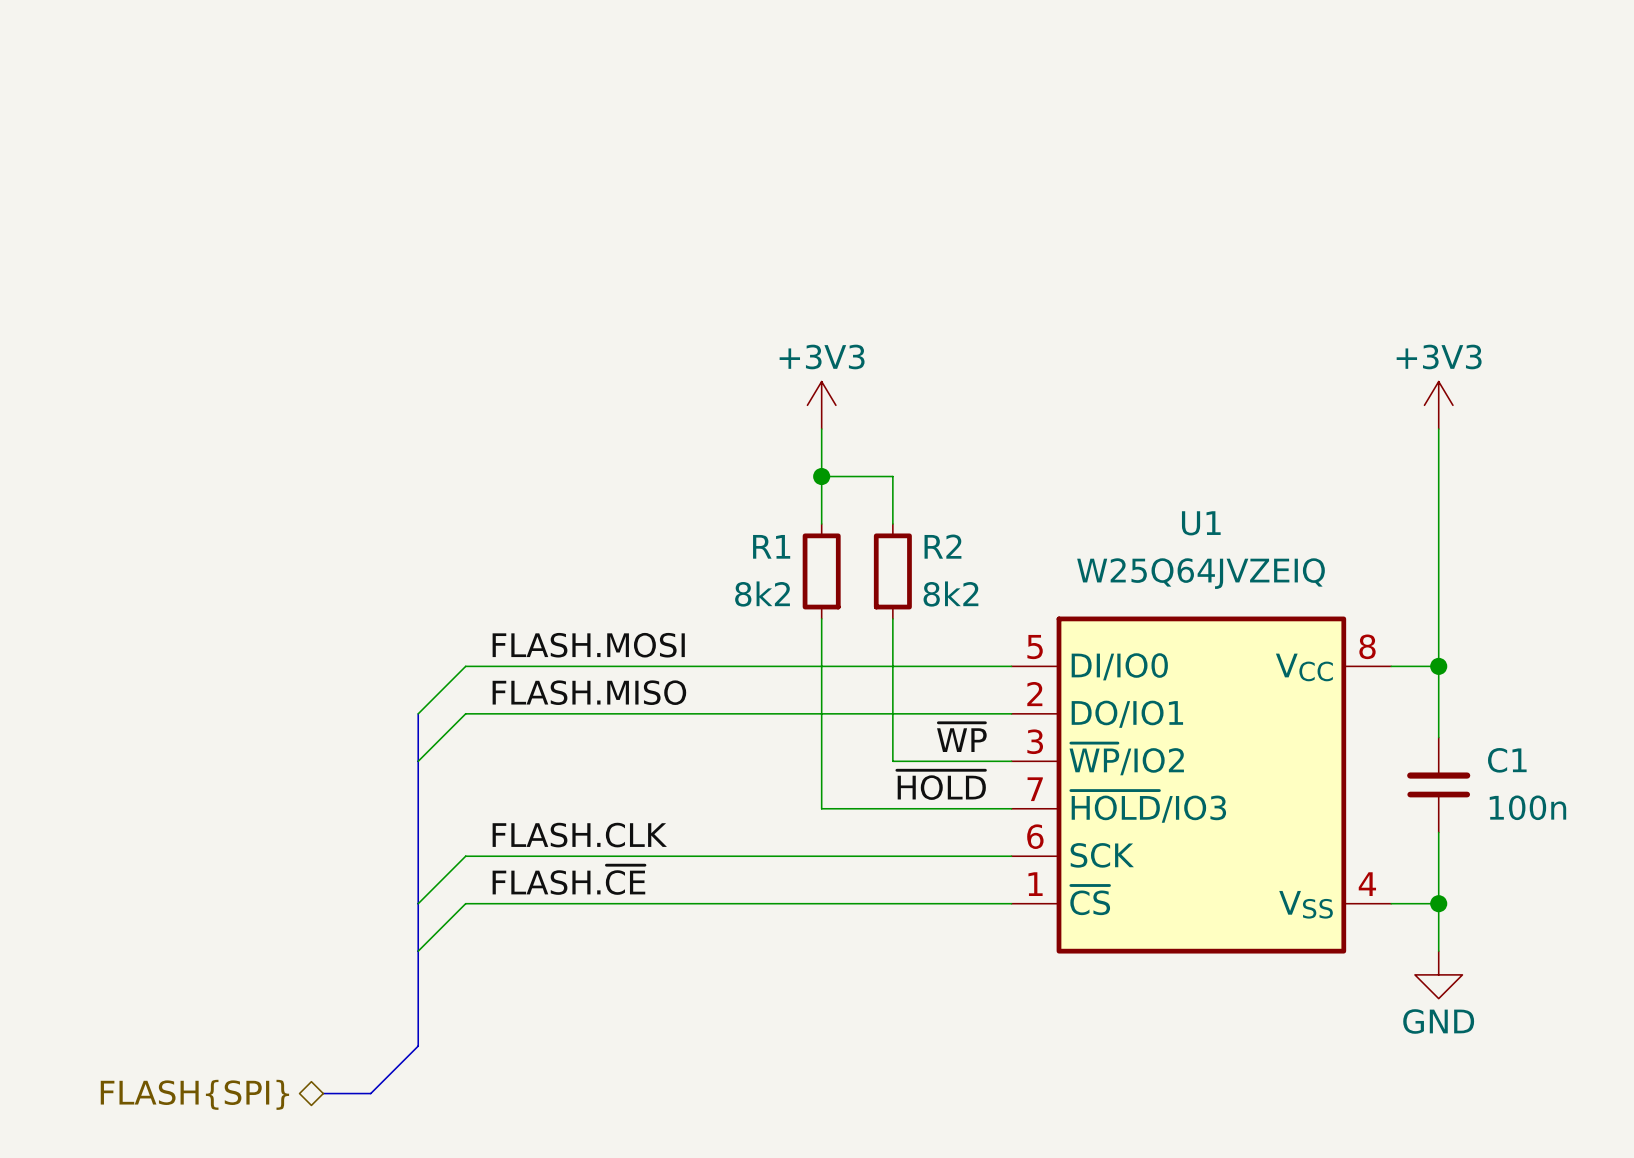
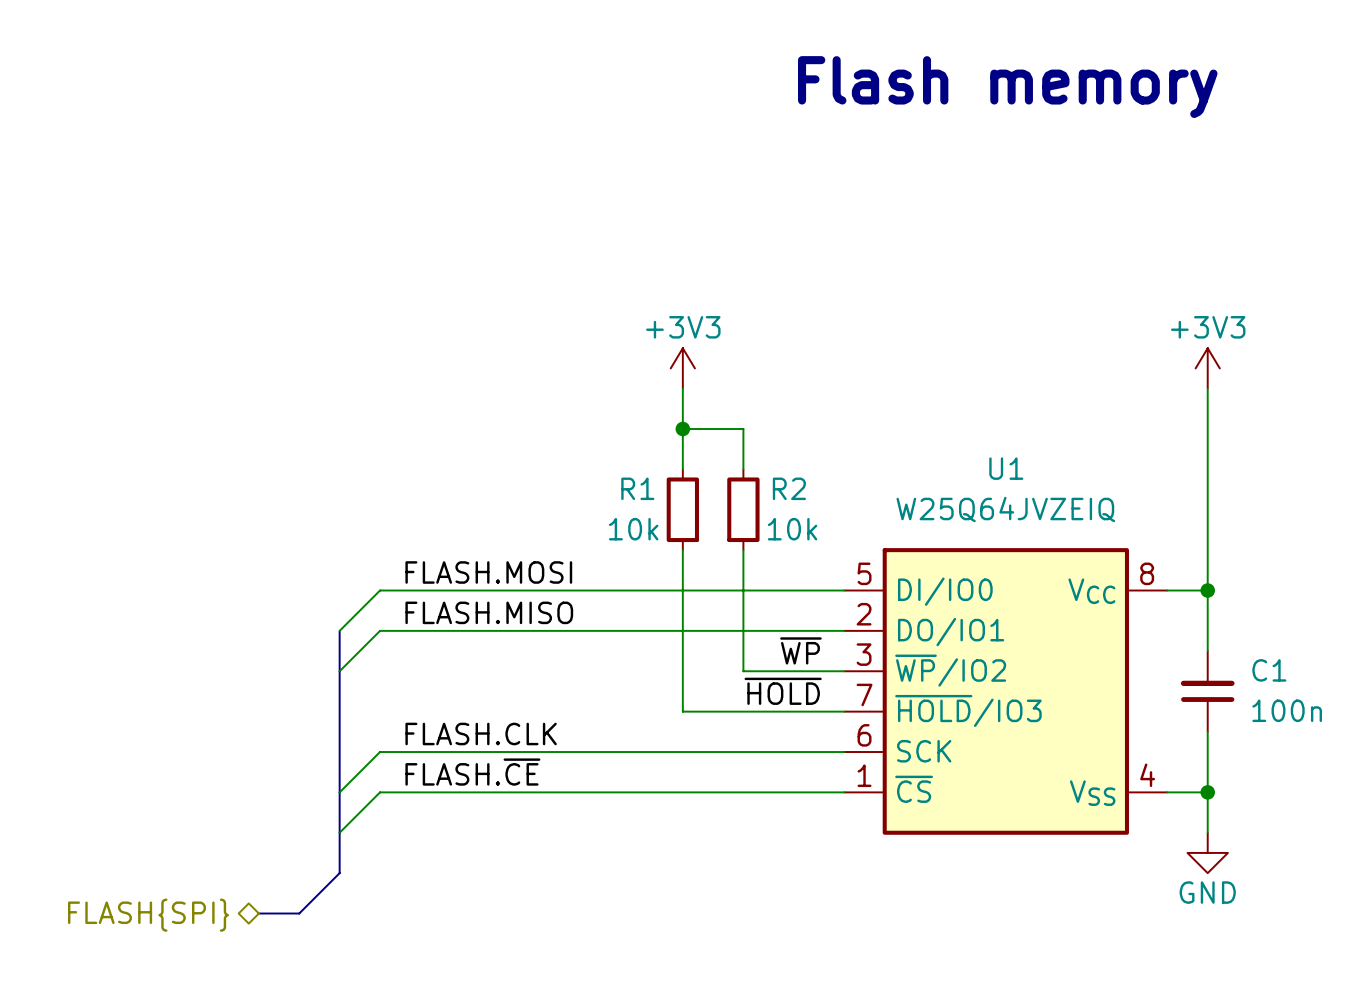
text: none -> Flash memory (1007, 87)
R1 text: 8k2 (762, 594) -> 10k (633, 529)
R2 text: 8k2 (950, 594) -> 10k (792, 529)
bus: (418, 998) (418, 1046) (370, 1093) (323, 1093) -> (339, 873) (299, 913) (258, 913)
hierarchical label position: FLASH{SPI} (194, 1094) -> FLASH{SPI} (148, 915)

